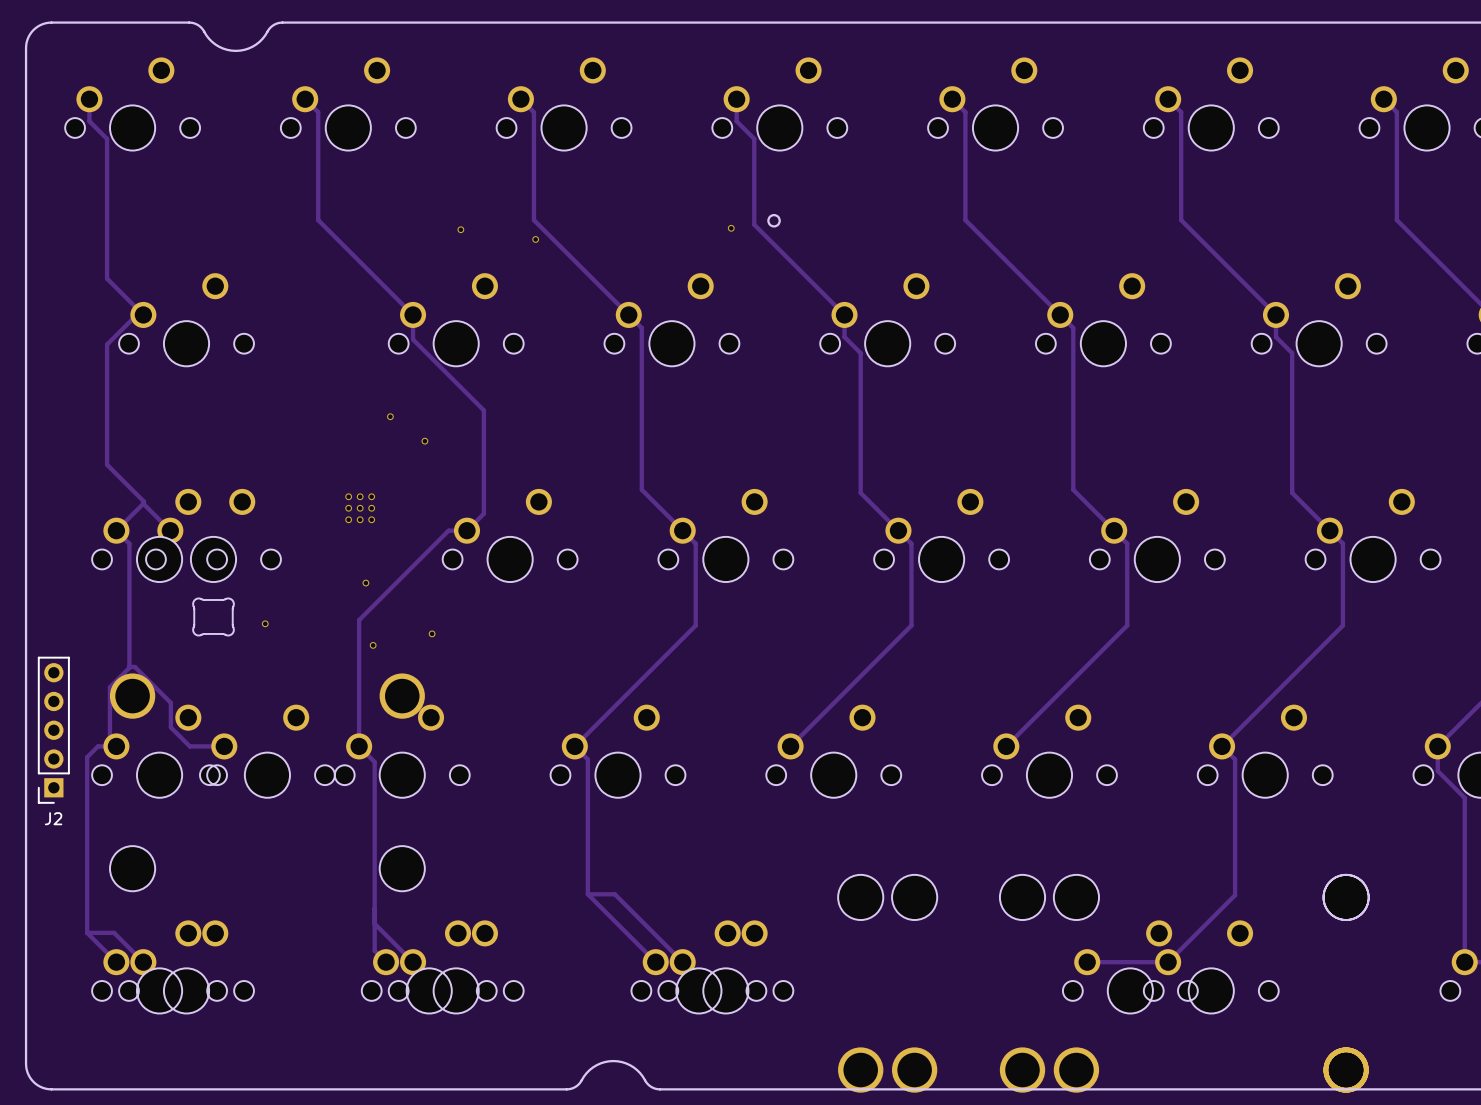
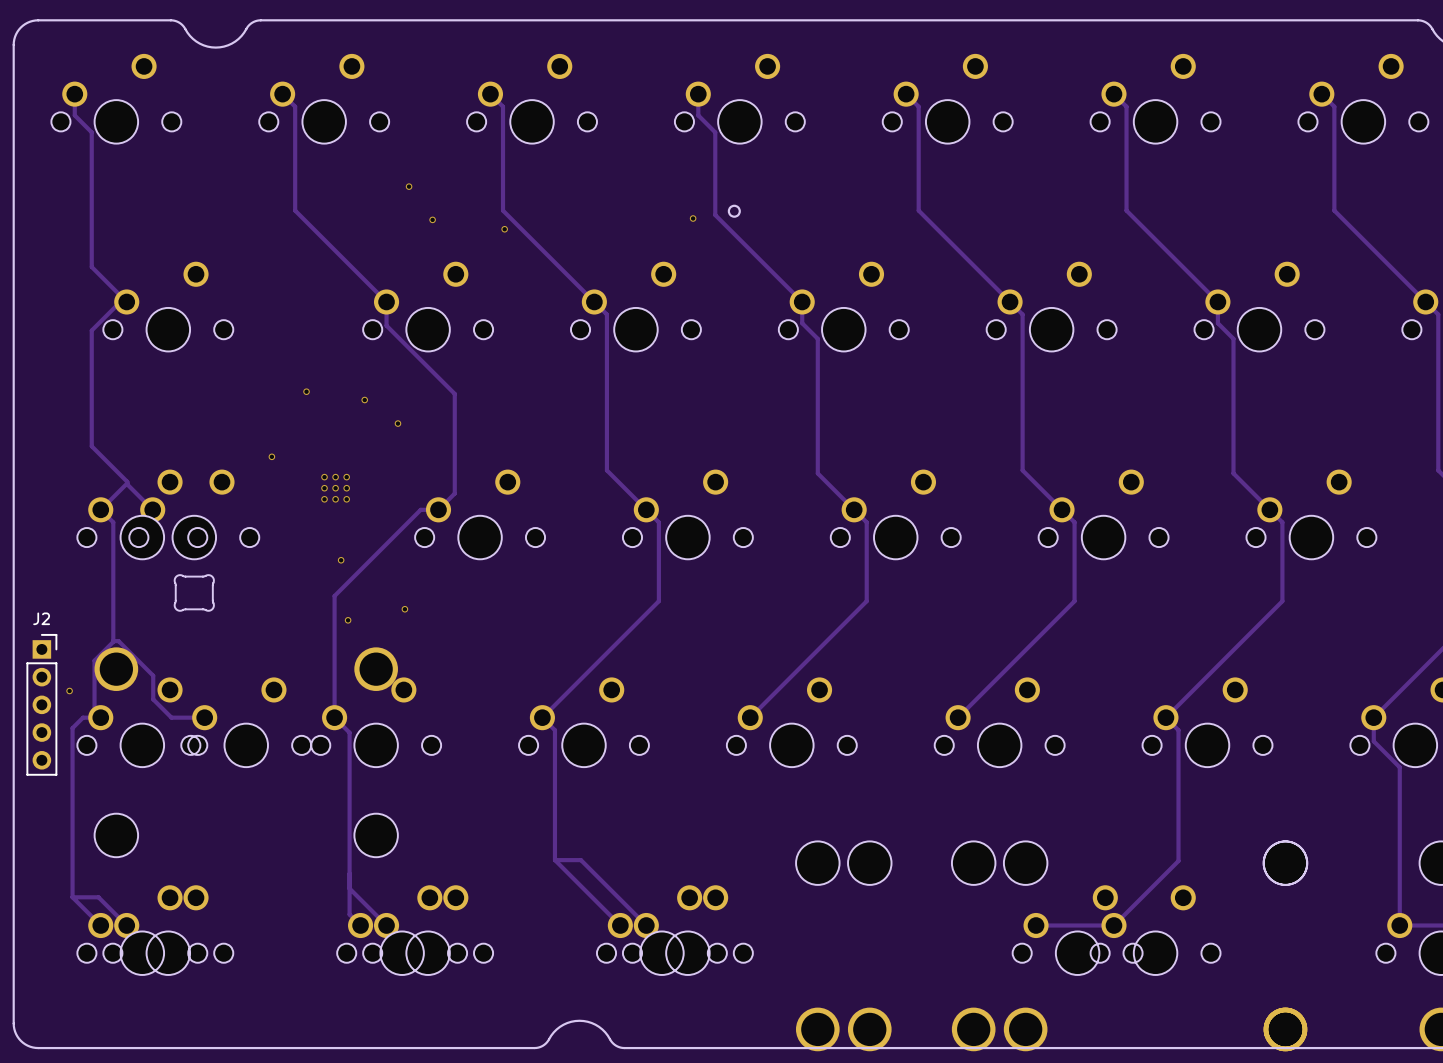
via: none -> (409, 186)
via: none -> (306, 391)
via: none -> (271, 456)
via: (265, 623) -> none
via: none -> (69, 690)
J2 rotation: 0° (53, 730) -> 180° (41, 704)

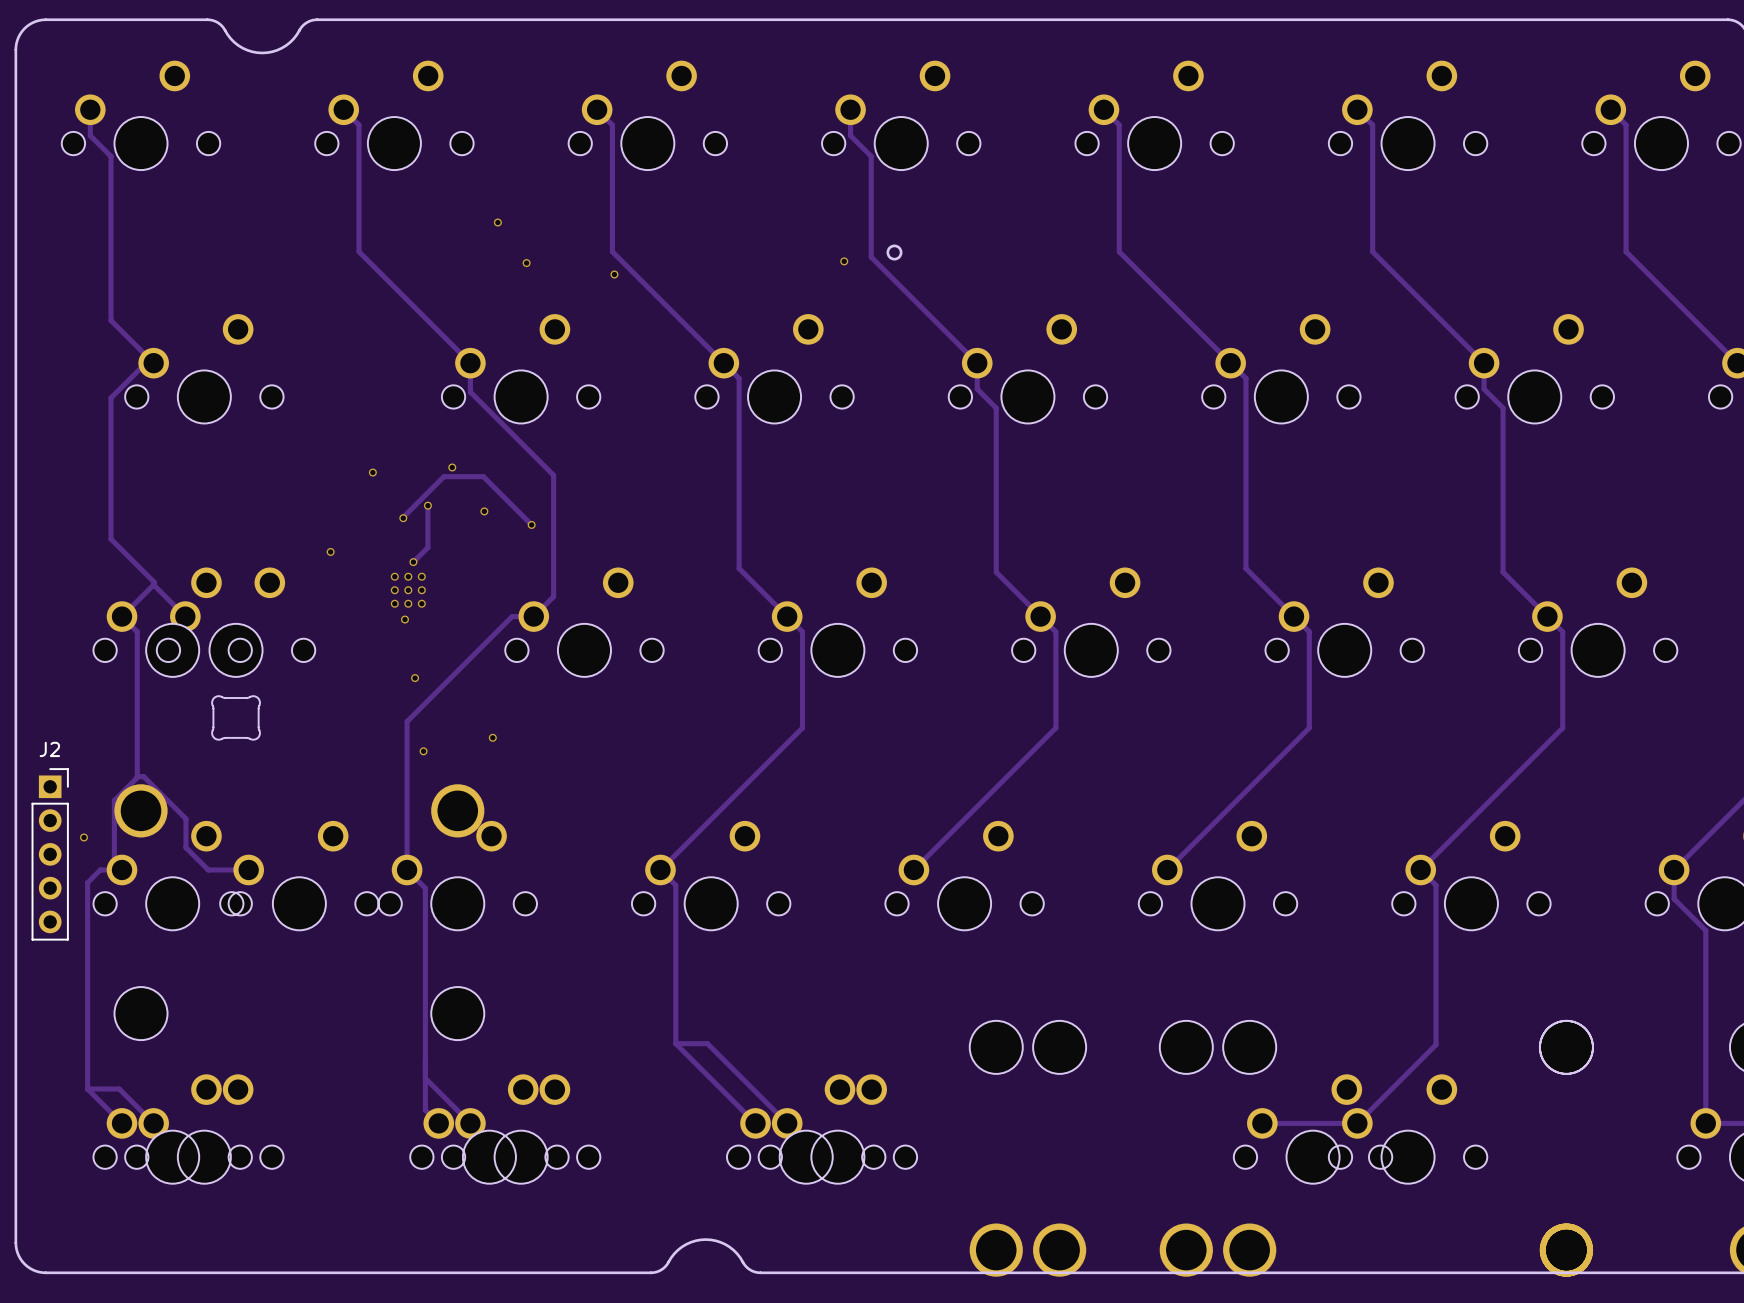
via: none -> (452, 467)
via: (364, 400) -> none
track: none -> (427, 505) (427, 547) (413, 562)
via: none -> (427, 505)
track: none -> (403, 518) (443, 476) (483, 476) (531, 524)
via: none -> (403, 518)
via: none -> (531, 524)
via: none -> (413, 562)
via: none -> (404, 619)

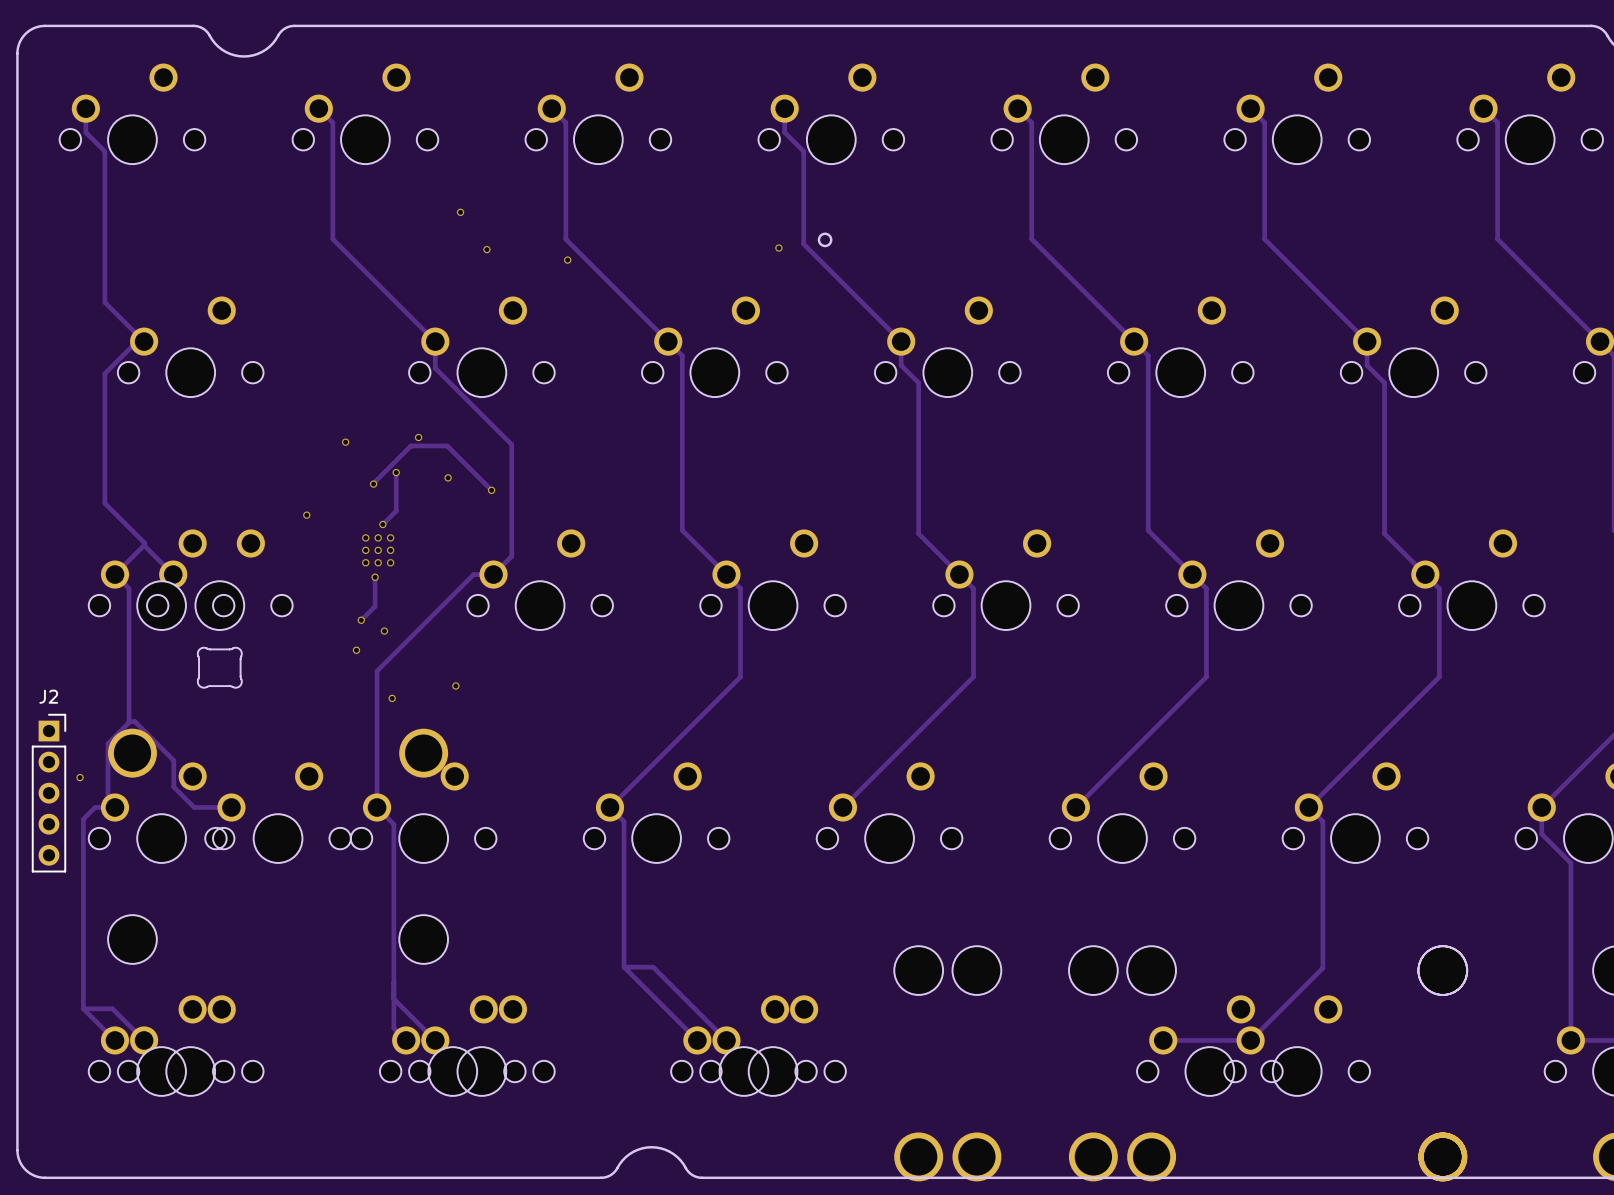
track: none -> (375, 575) (375, 606) (361, 620)
via: none -> (361, 620)
via: none -> (356, 650)

